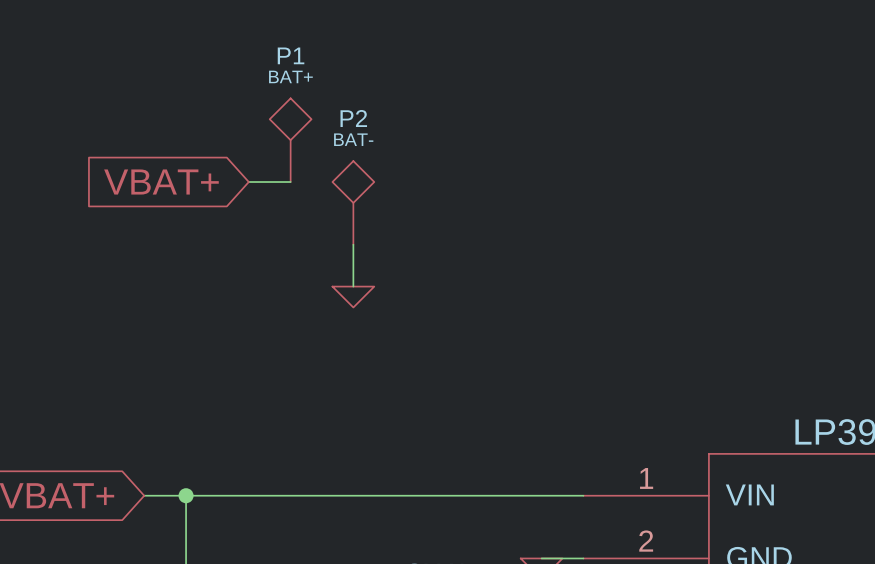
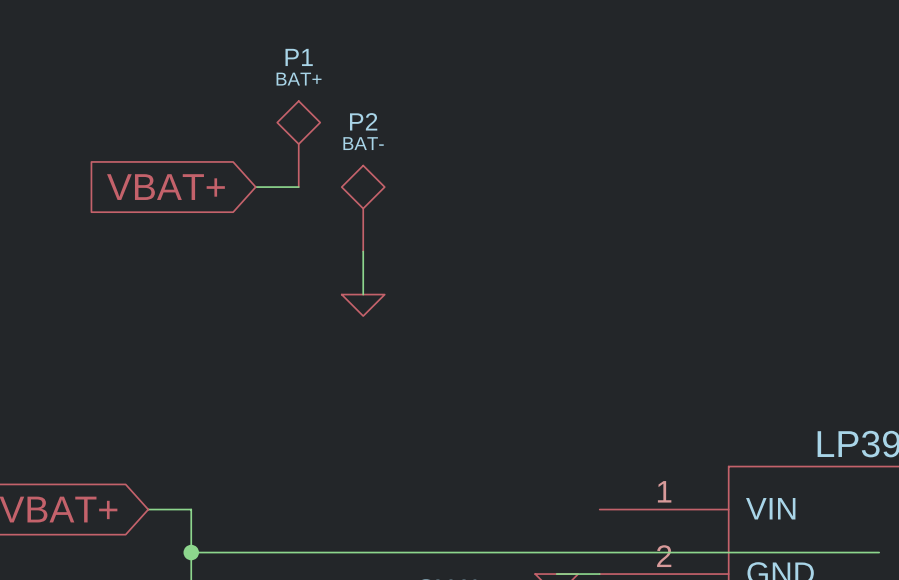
wire: (186, 495) (583, 495) -> none
junction position: (186, 495) -> (191, 552)
wire: none -> (191, 552) (879, 552)

